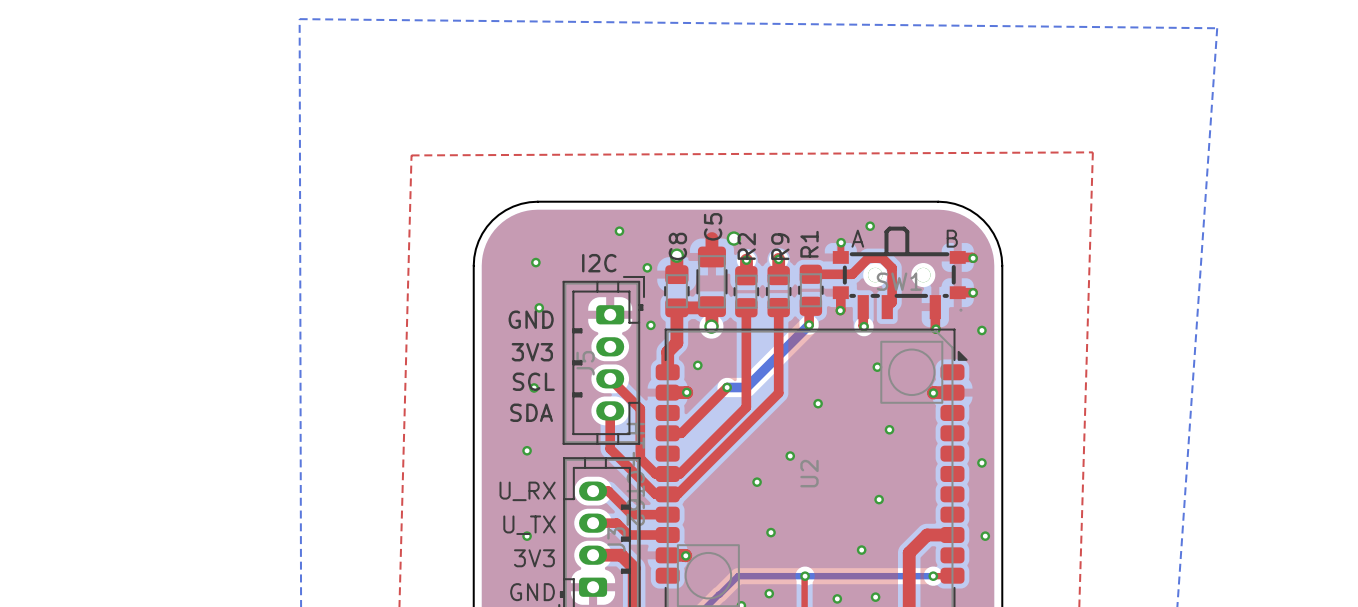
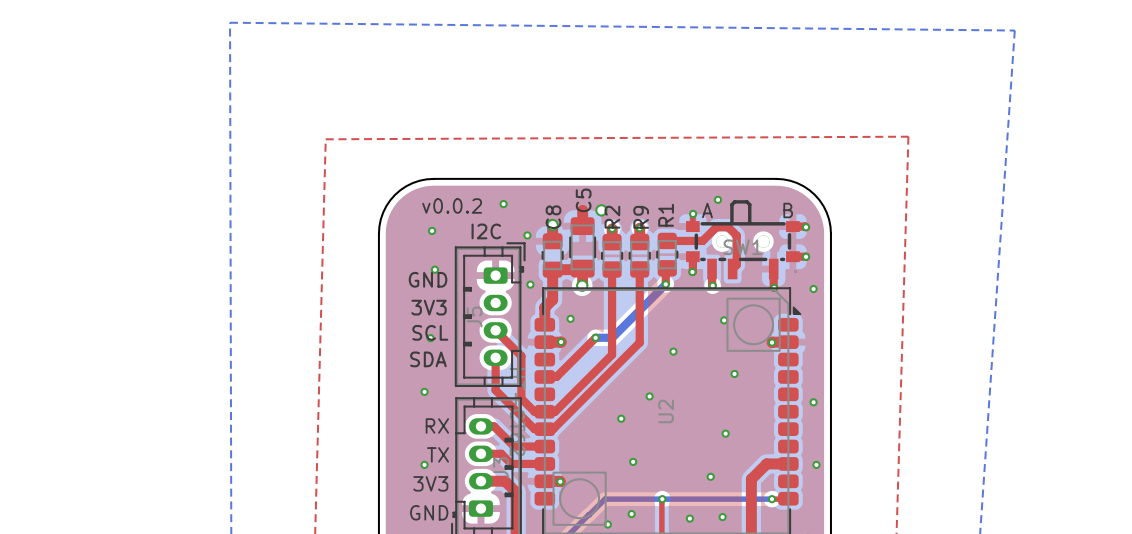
text: none -> v0.0.2 (452, 205)
text: U_RX (527, 491) -> RX (437, 425)
text: U_TX (529, 525) -> TX (438, 454)

